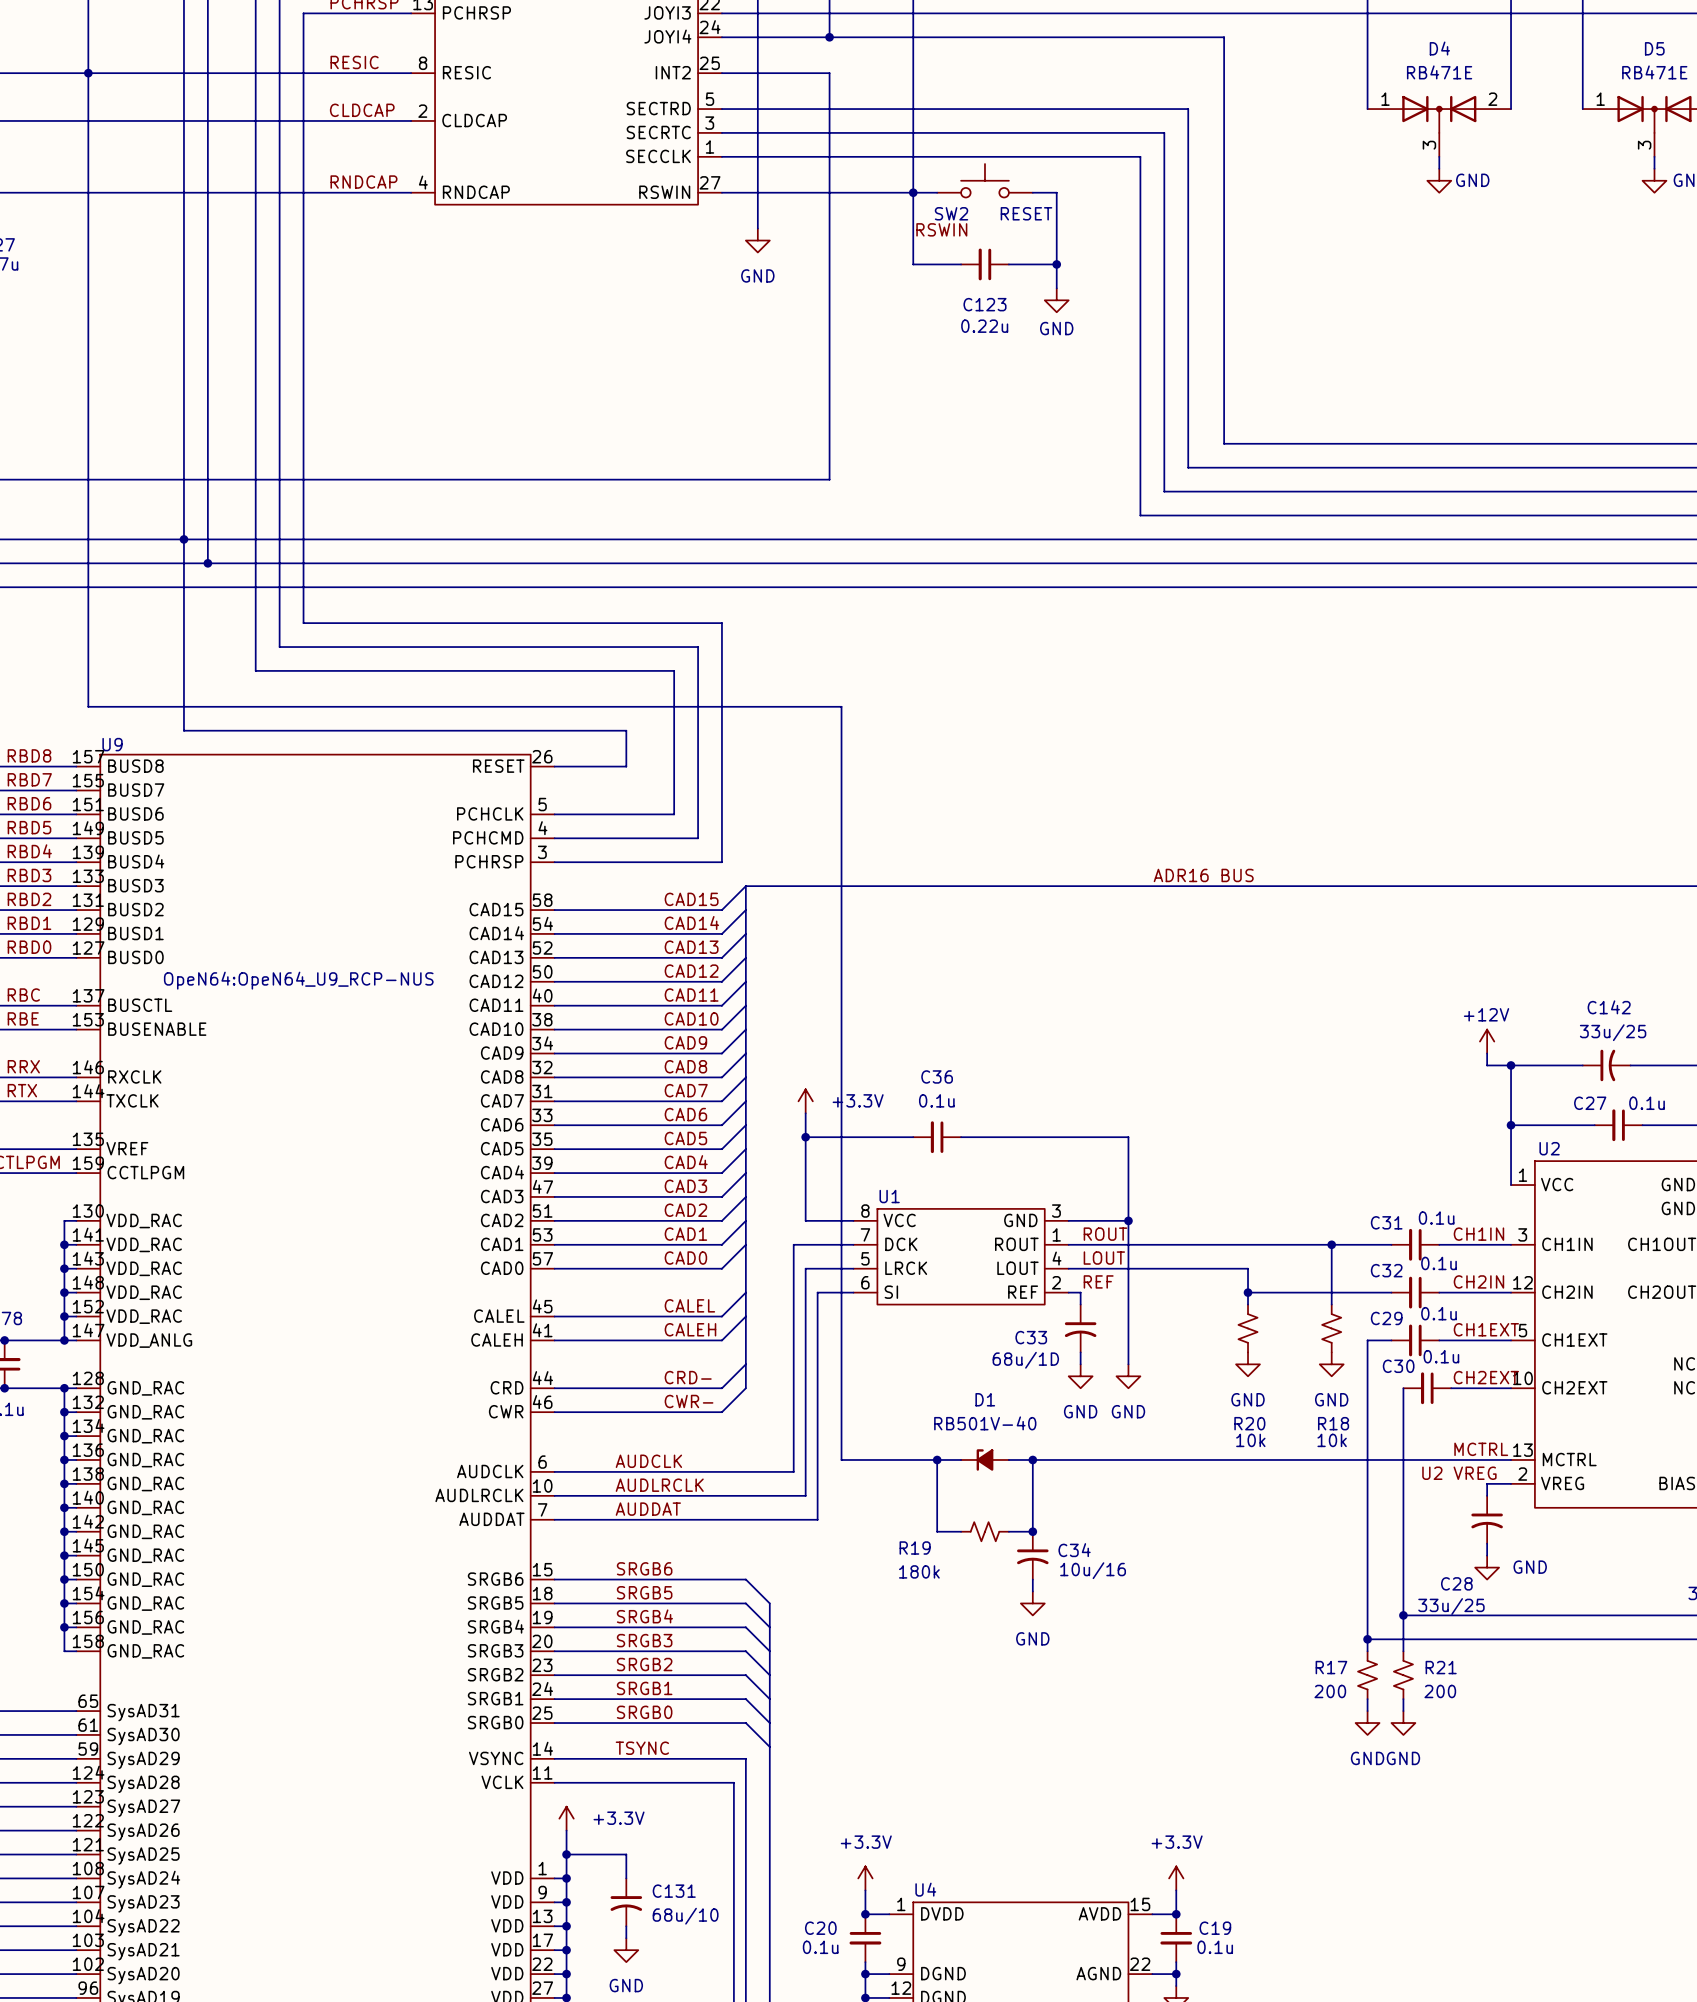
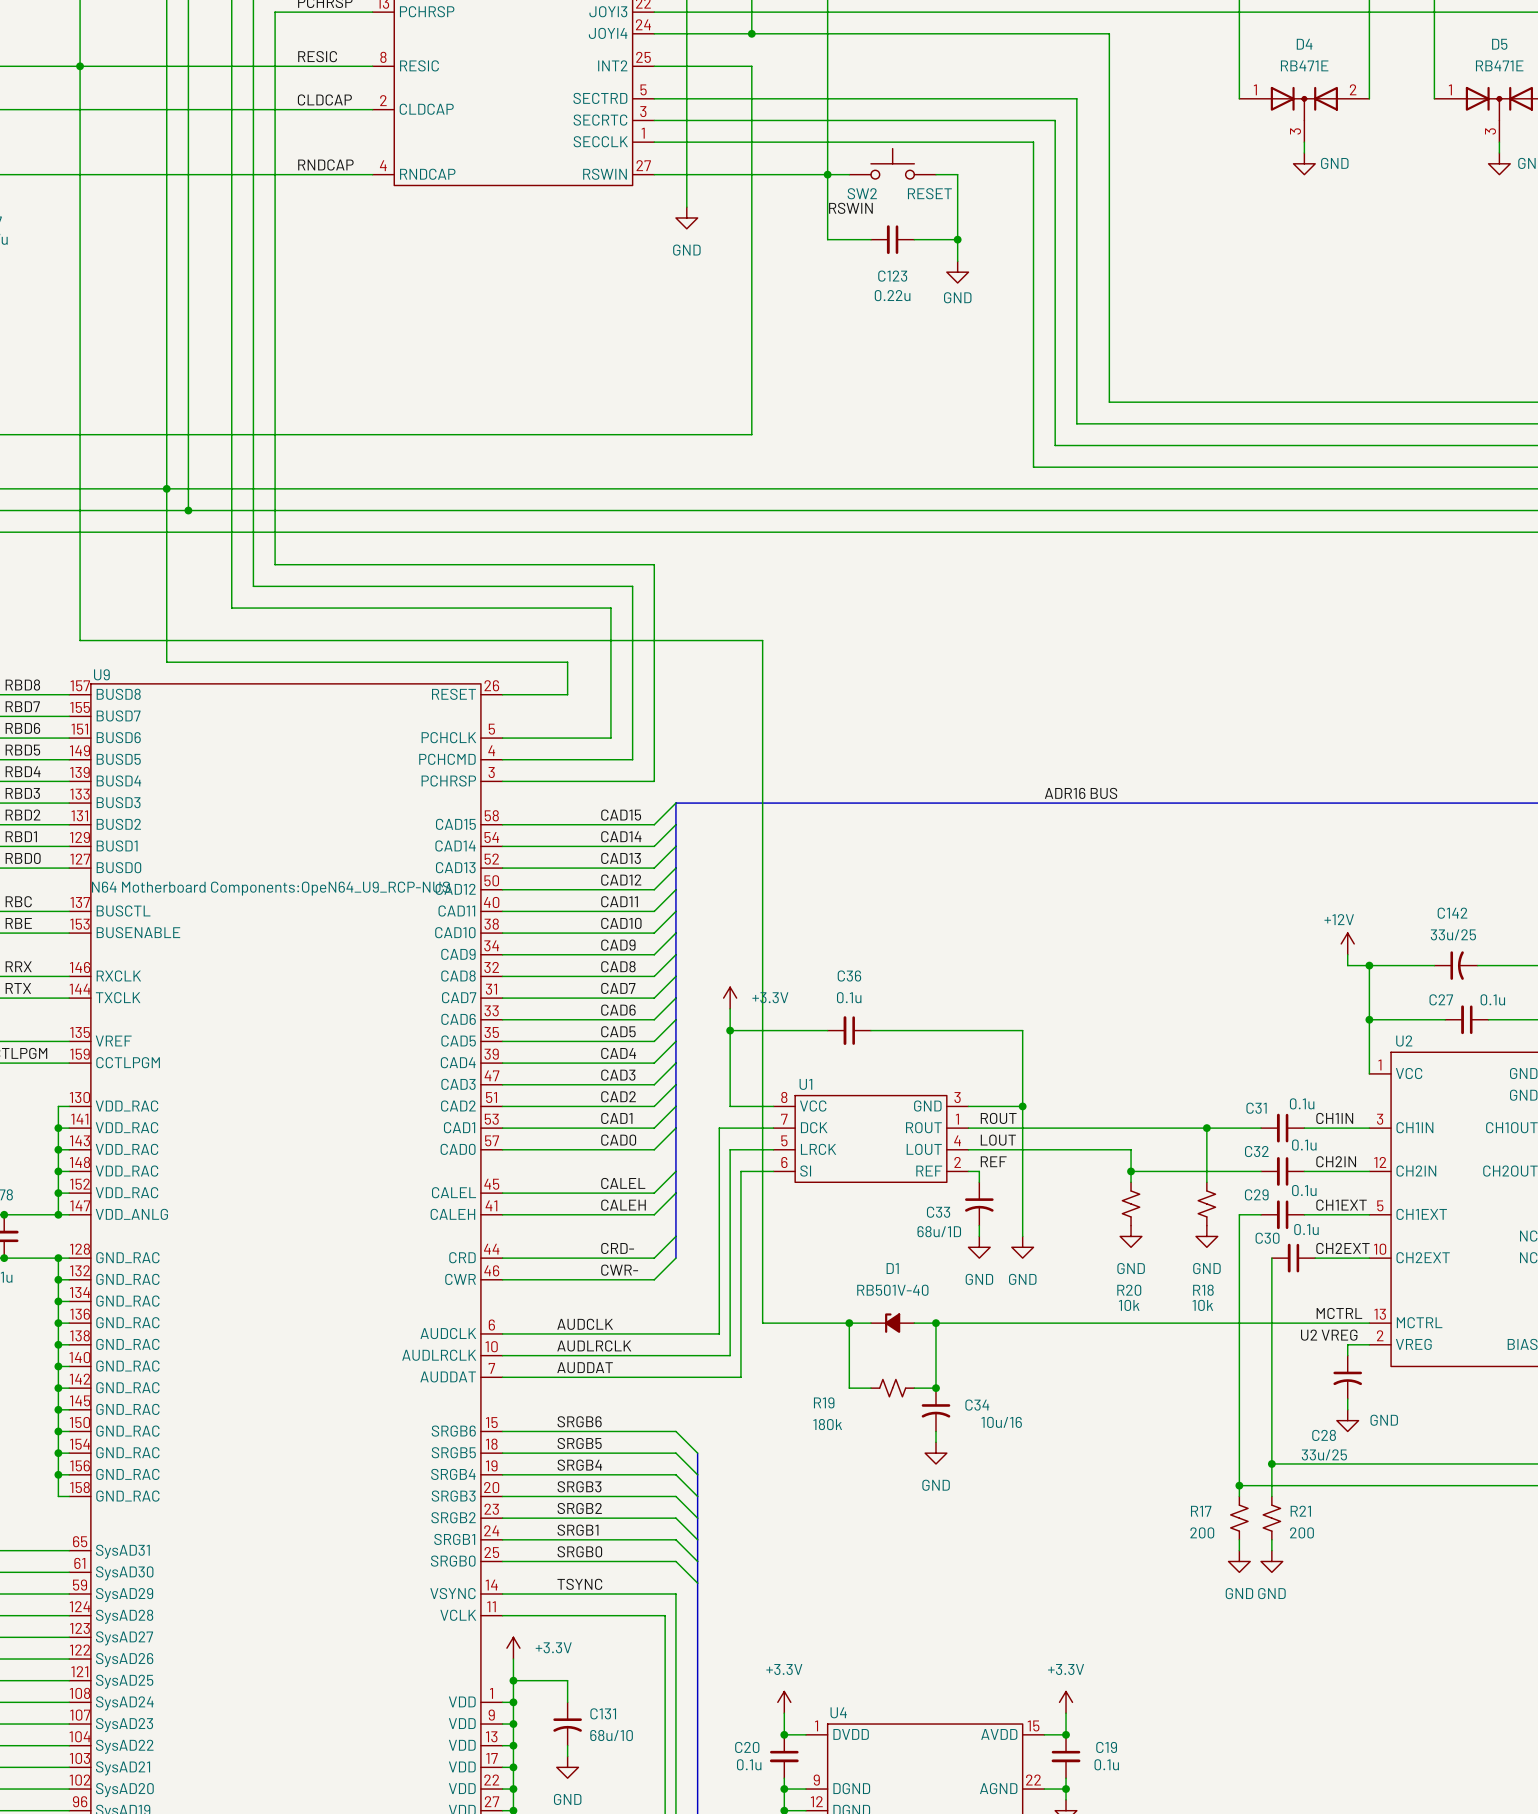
U9 text: OpeN64:OpeN64_U9_RCP-NUS (298, 980) -> N64 Motherboard Components:OpeN64_U9_RCP-NUS (271, 888)

